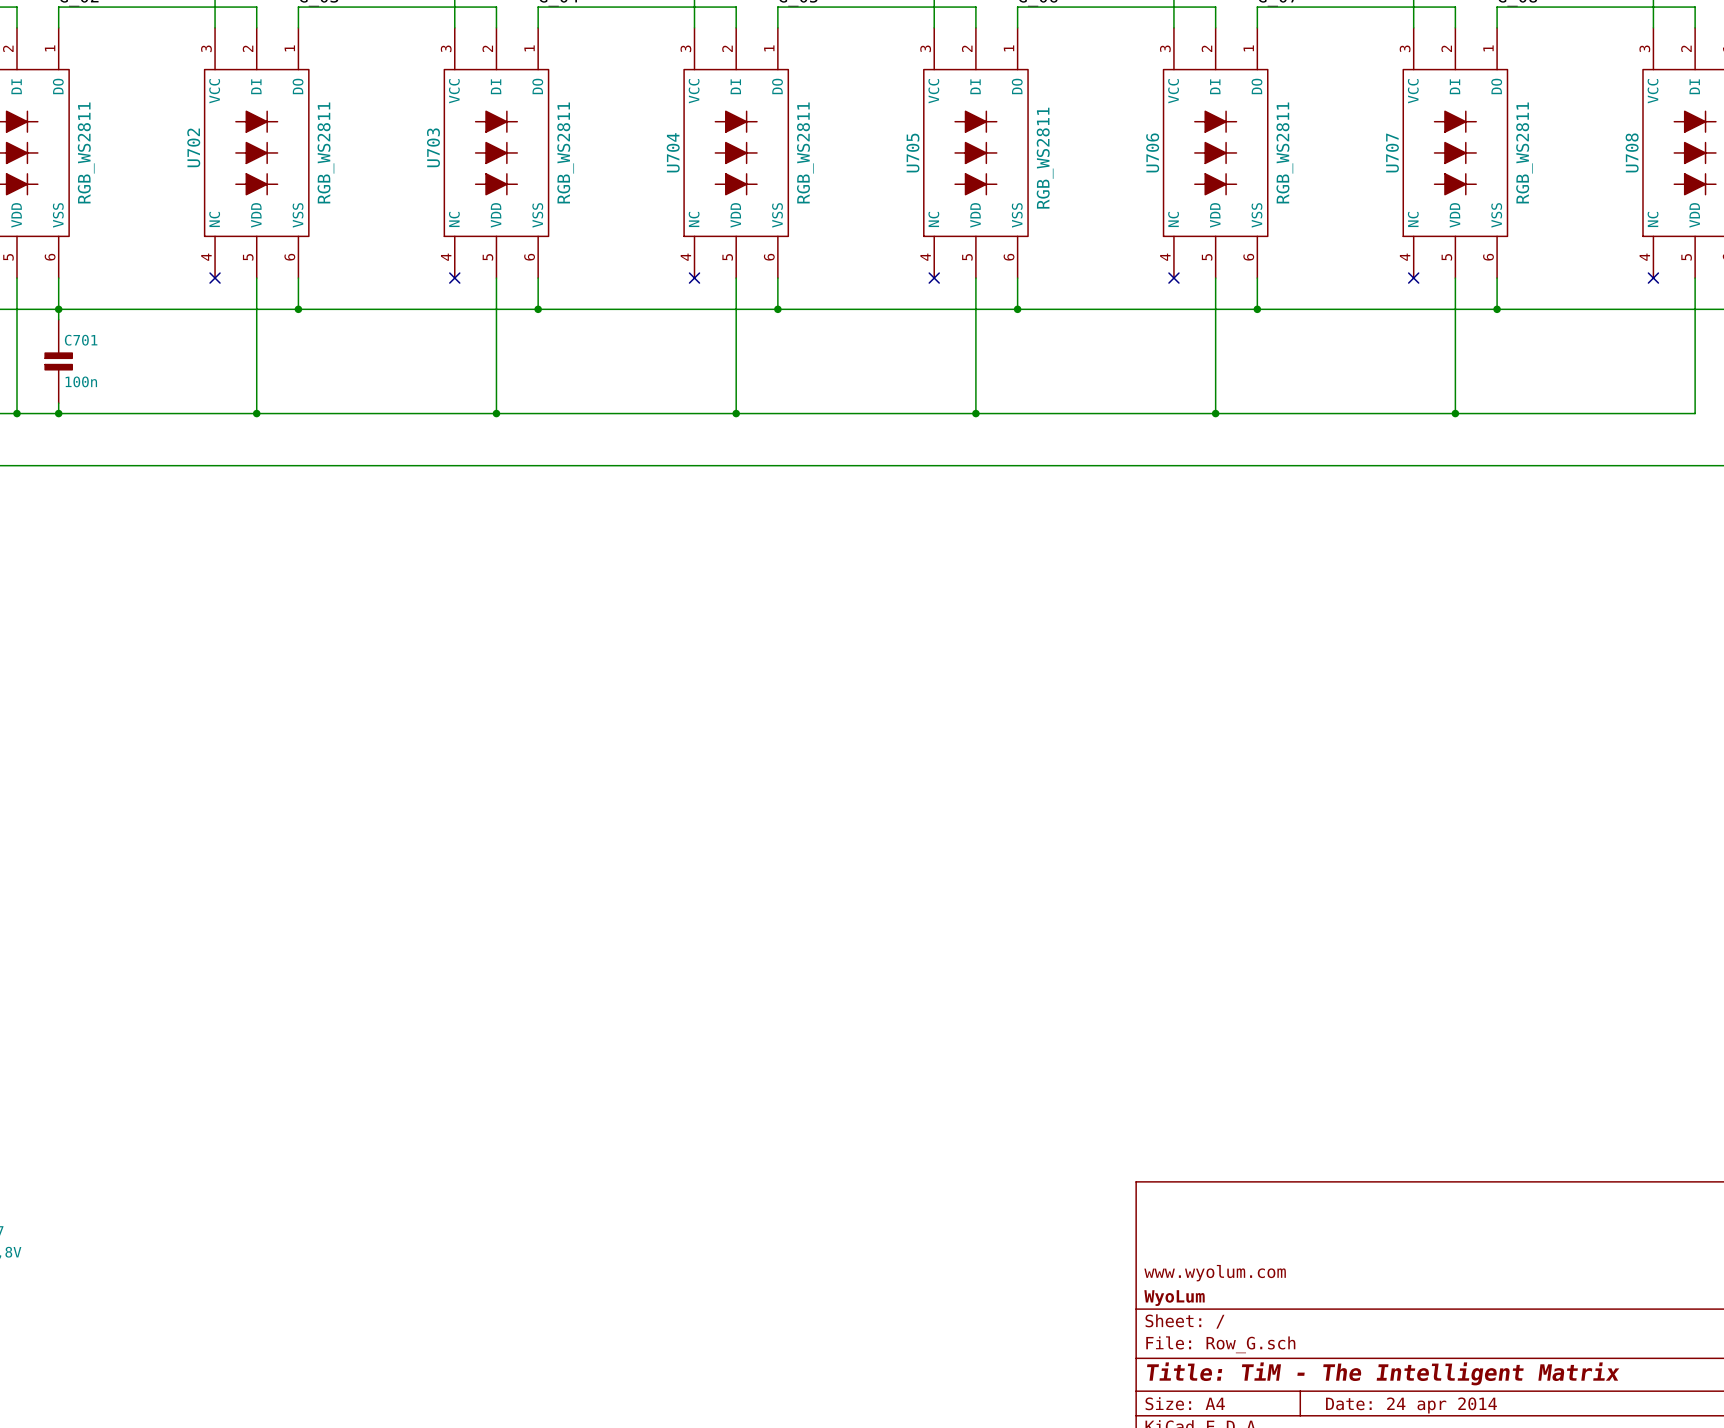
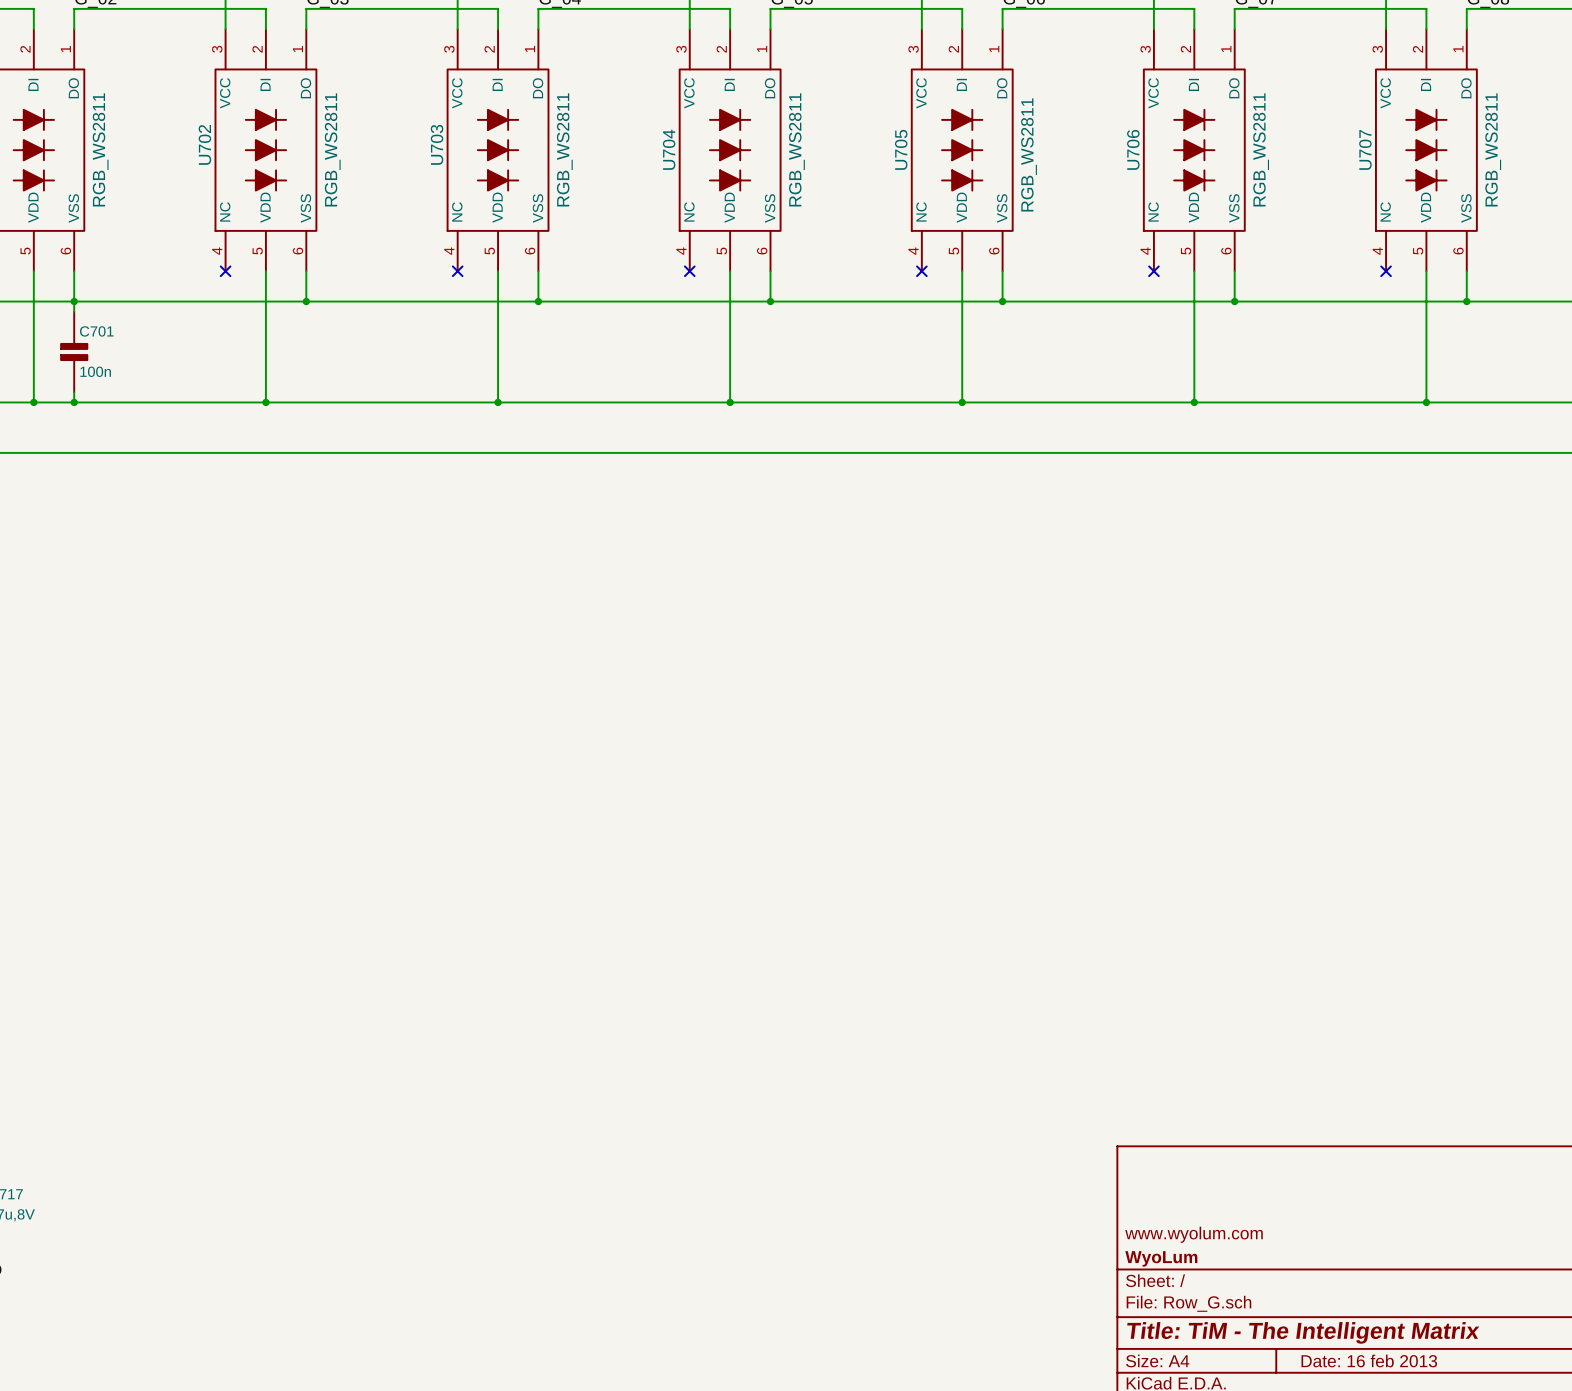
title block: Date: 24 apr 2014 (1411, 1405) -> Date: 16 feb 2013 (1369, 1360)

